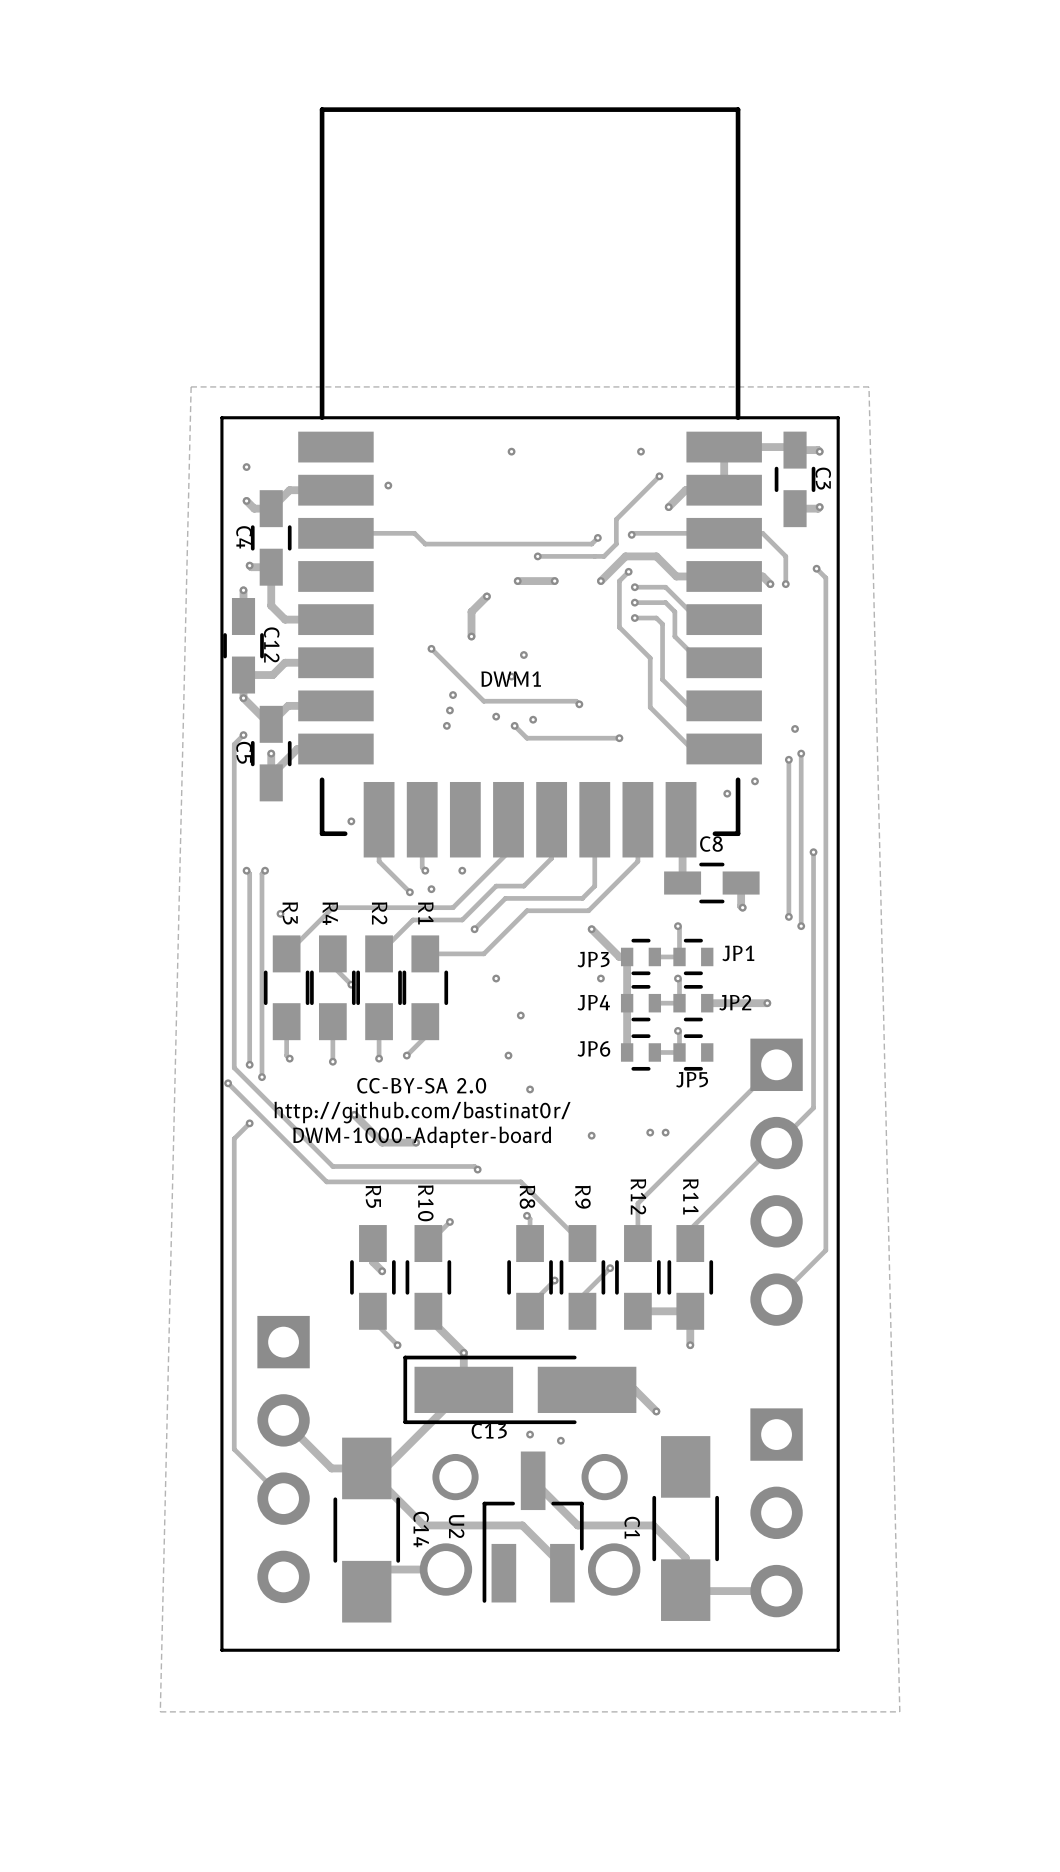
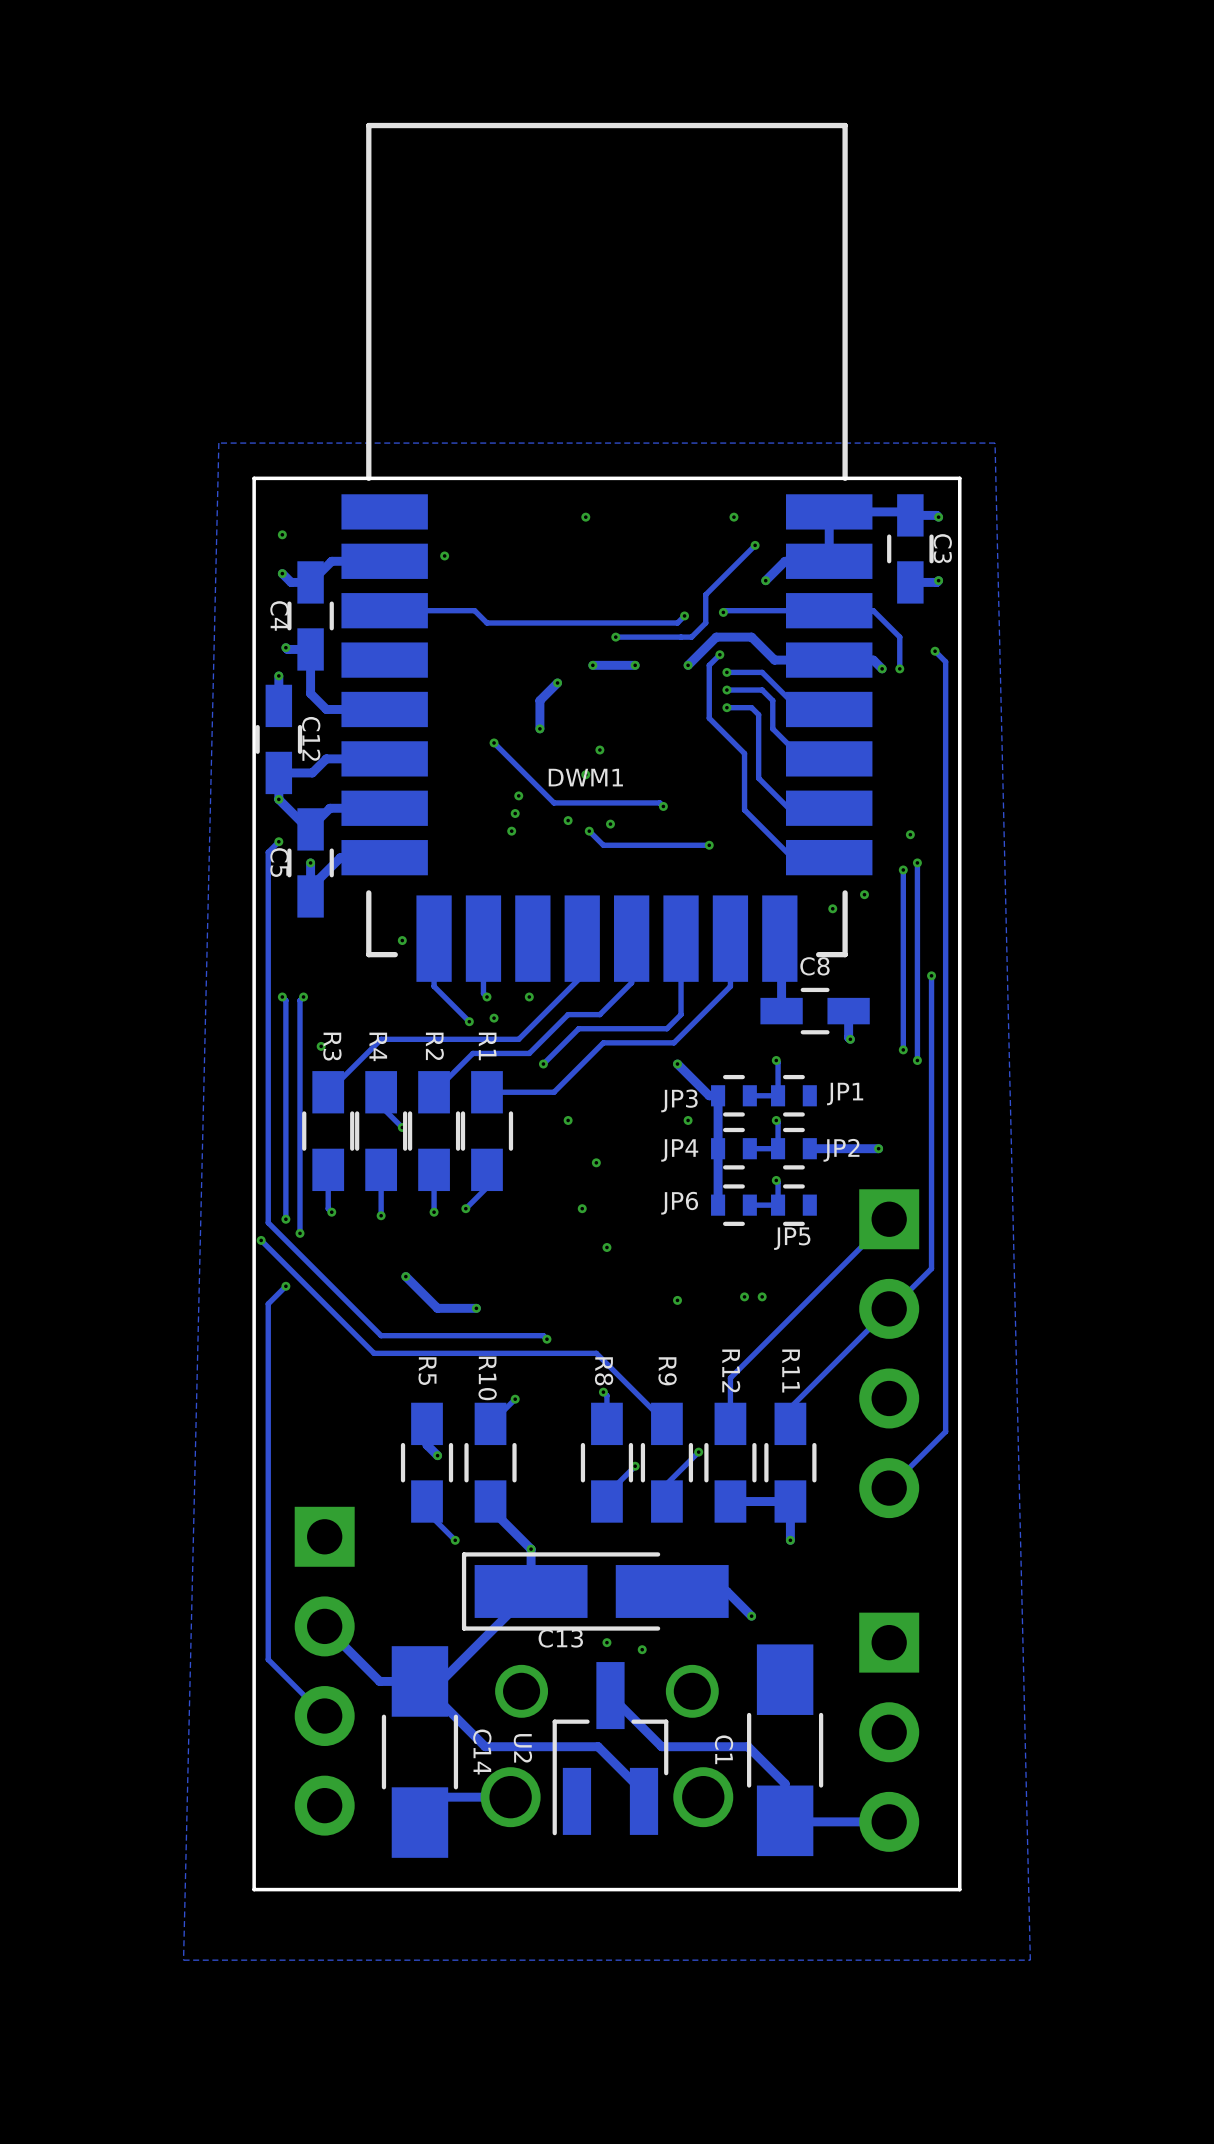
text: CC-BY-SA 2.0 (421, 1085) -> none
text: http://github.com/bastinat0r/ (422, 1112) -> none
text: DWM-1000-Adapter-board (422, 1137) -> none

